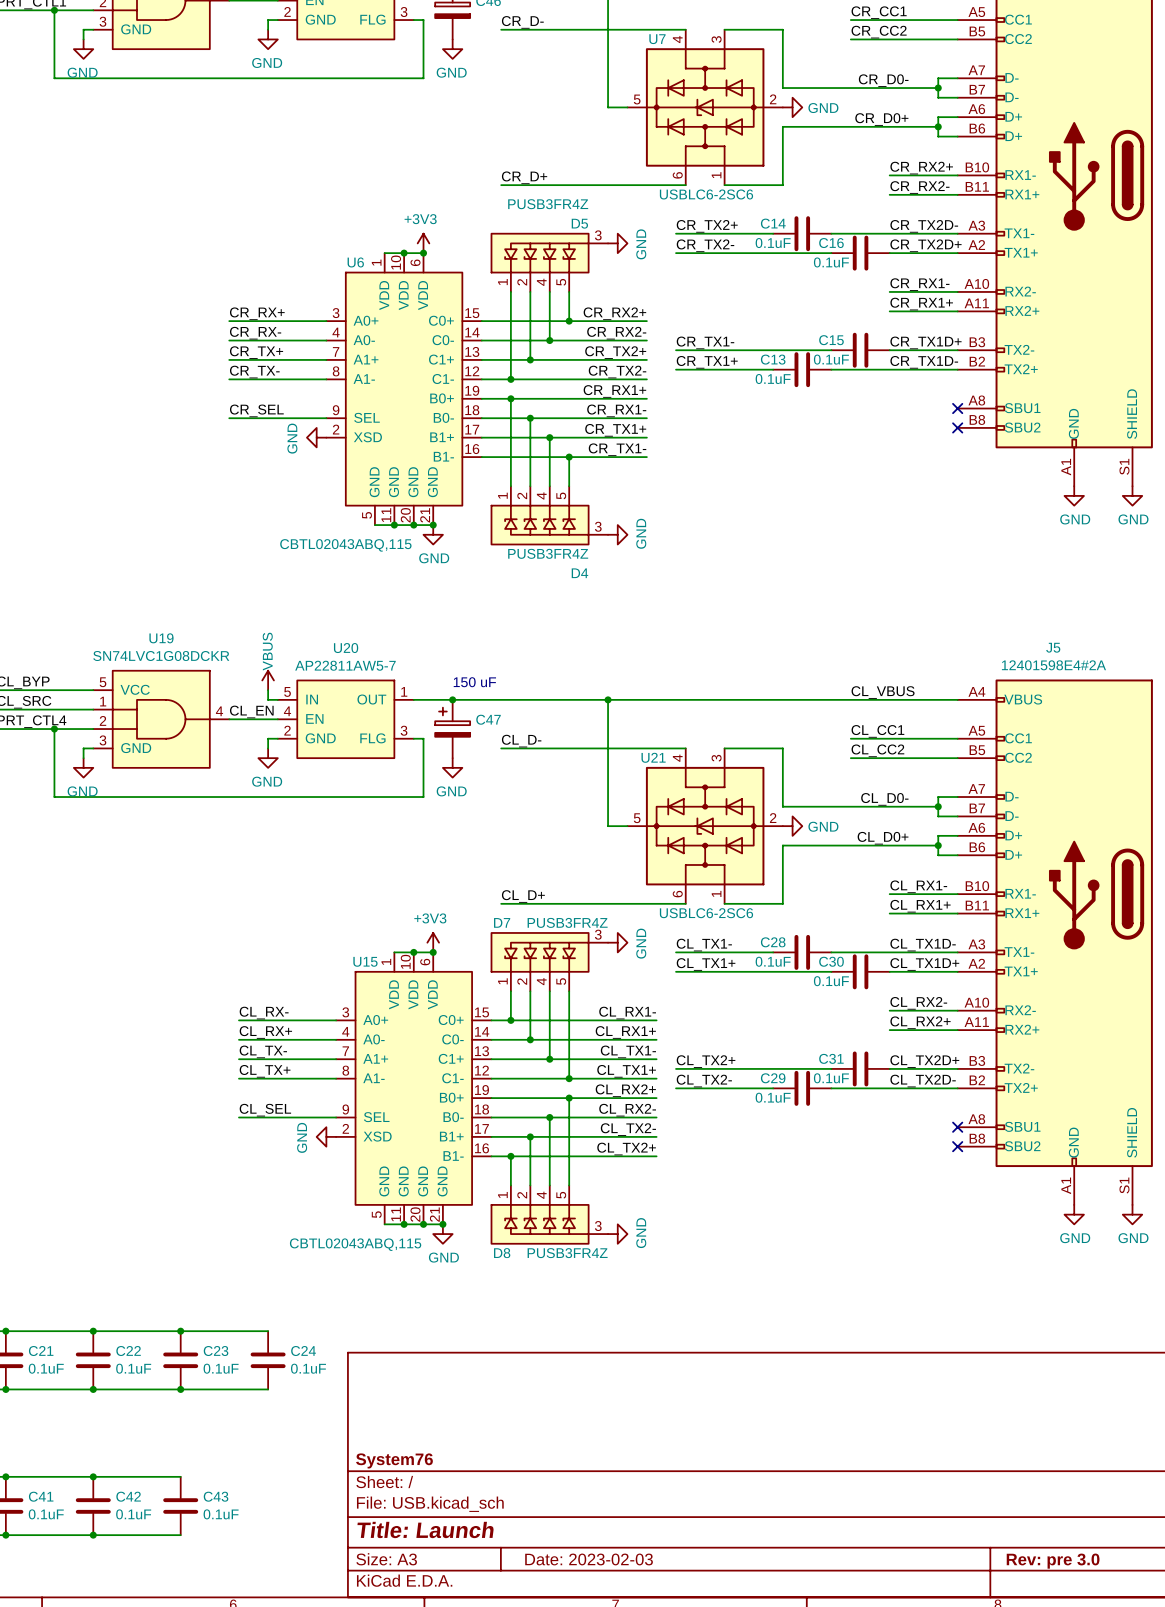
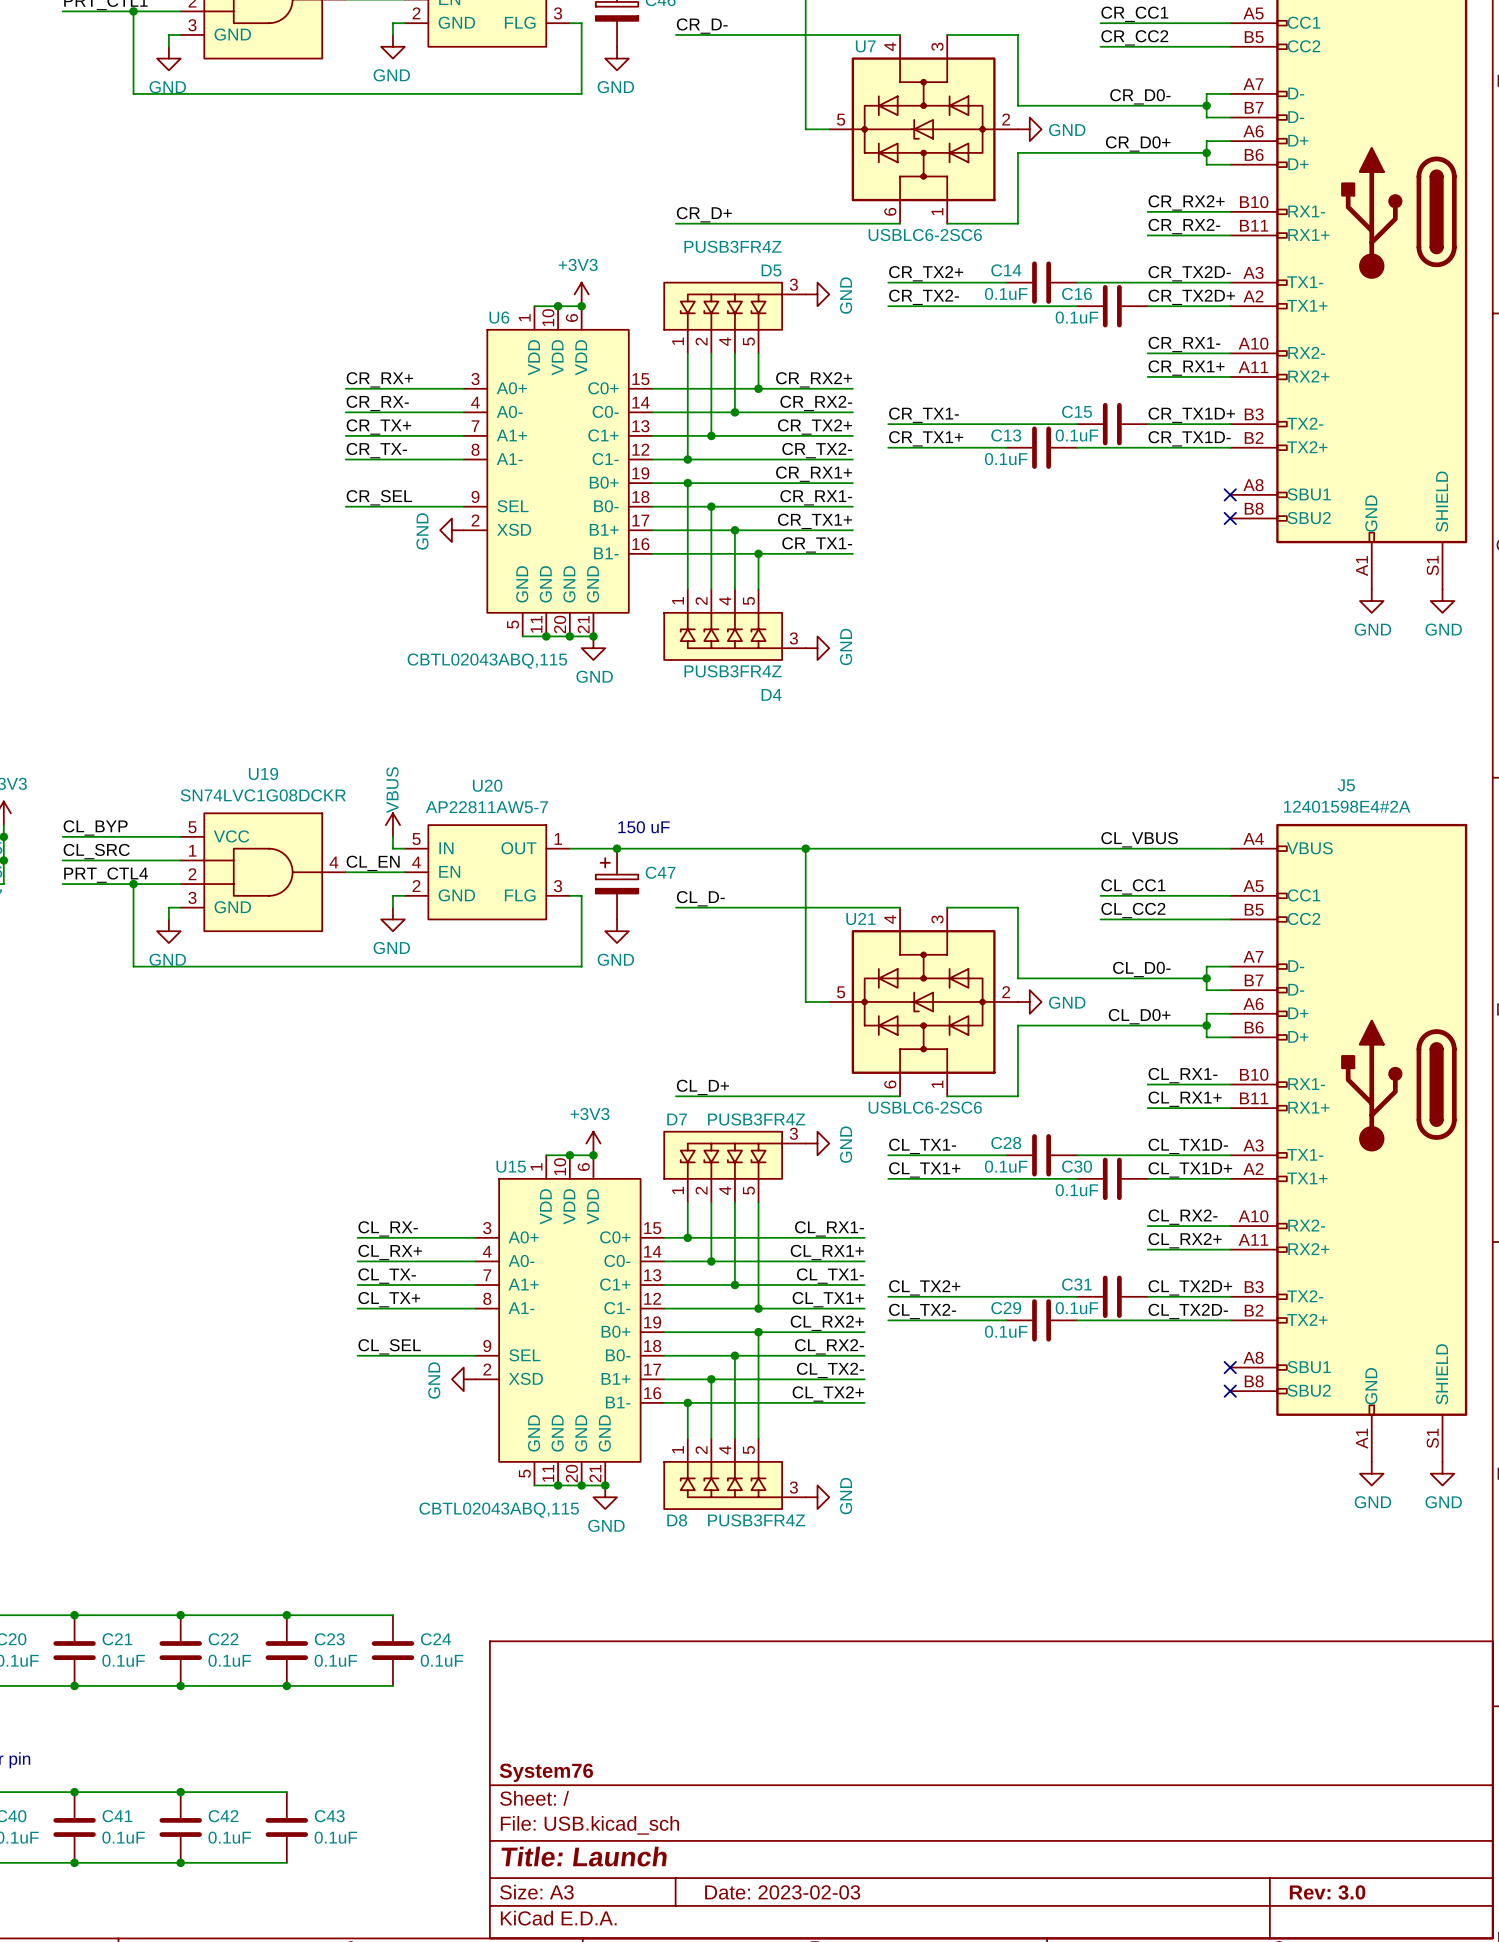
title block: Rev: pre 3.0 (1053, 1561) -> Rev: 3.0 (1327, 1892)

